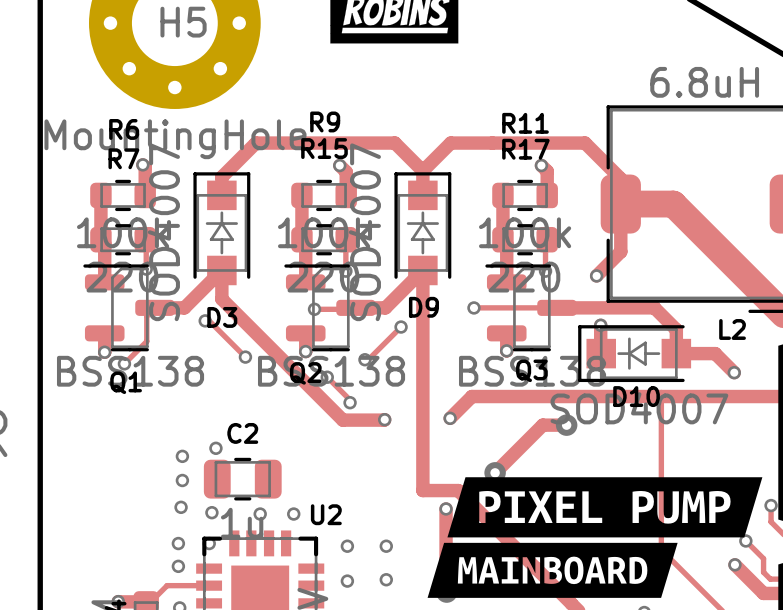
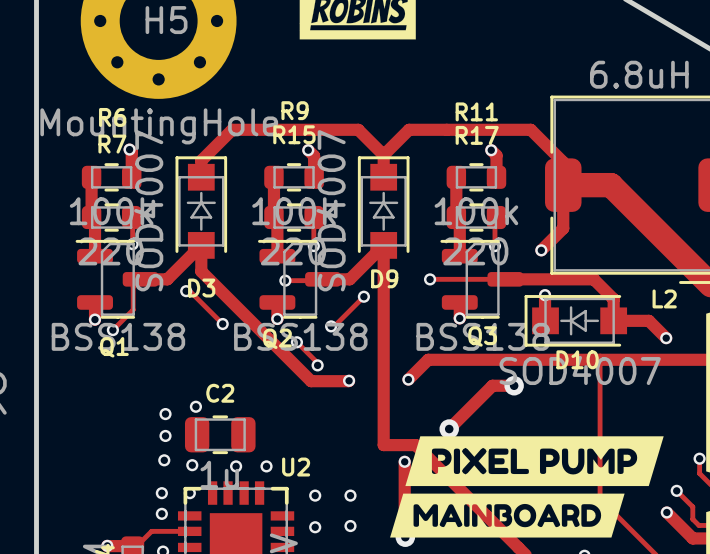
drawing shape: [447, 477, 763, 538] -> [405, 436, 664, 487]
drawing shape: [427, 542, 678, 598] -> [390, 493, 625, 538]

